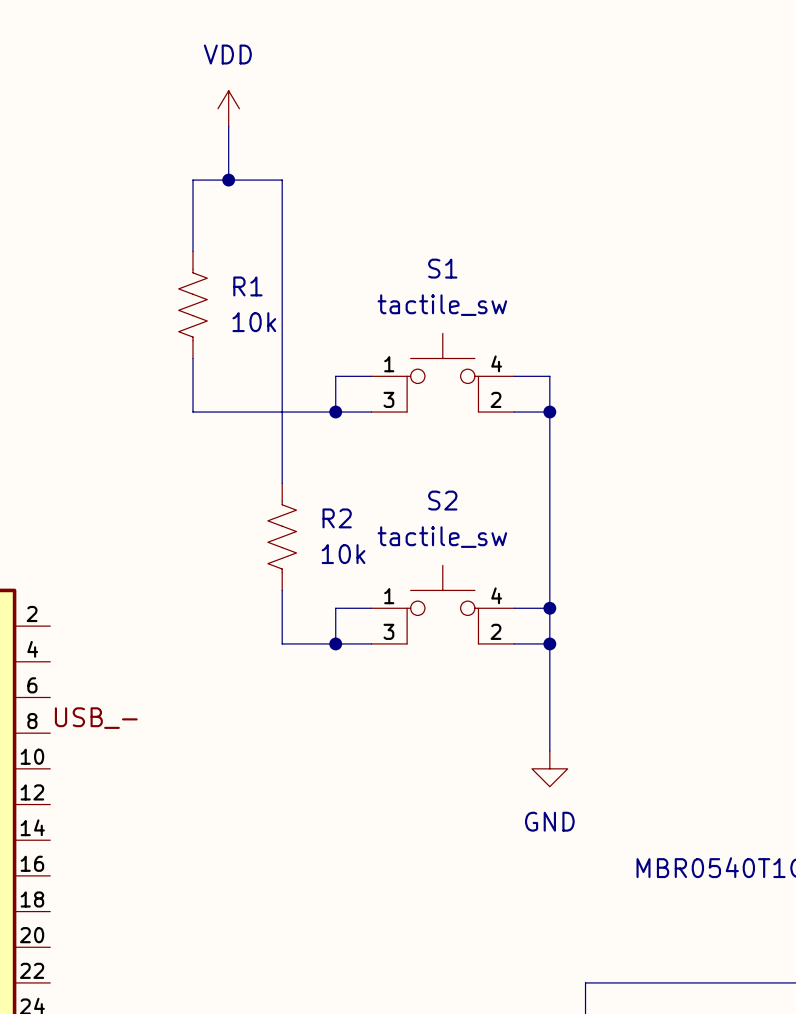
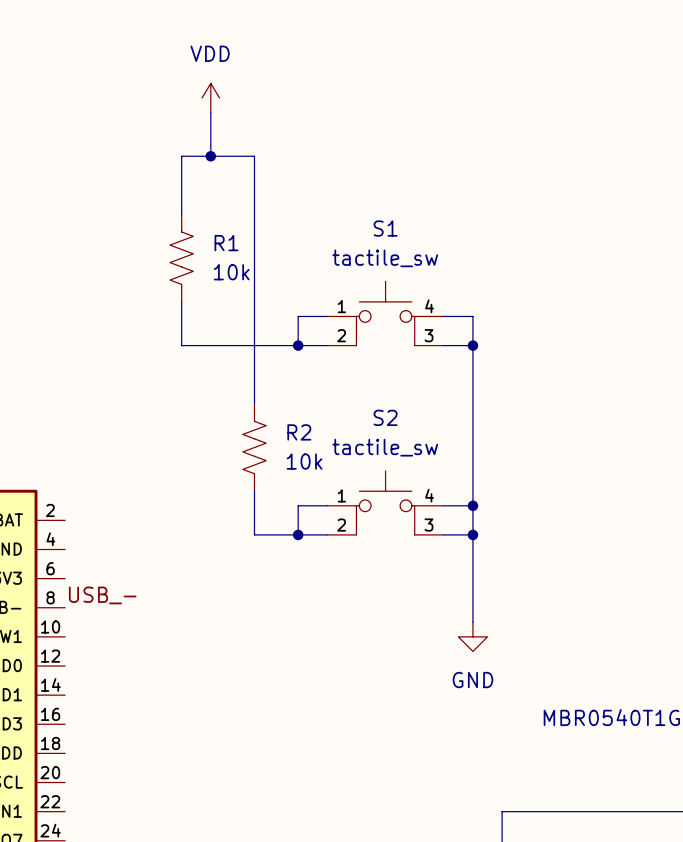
S1 pin number: 3 (388, 399) -> 2 (341, 335)
S1 pin number: 2 (495, 399) -> 3 (428, 335)
S2 pin number: 3 (388, 631) -> 2 (341, 525)
S2 pin number: 2 (495, 631) -> 3 (428, 525)

